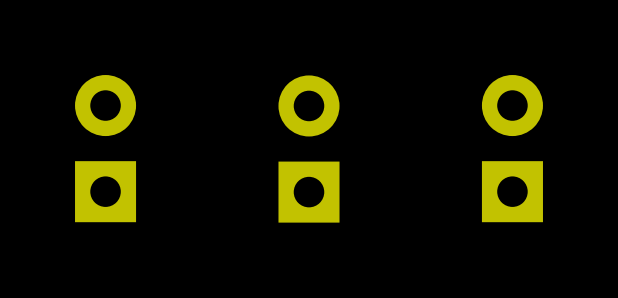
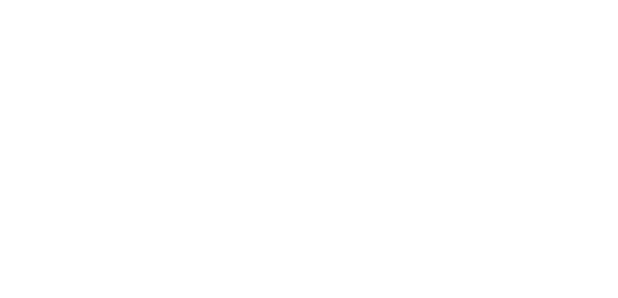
part: (105, 148) -> none
part: (512, 148) -> none
part: (308, 149) -> none

